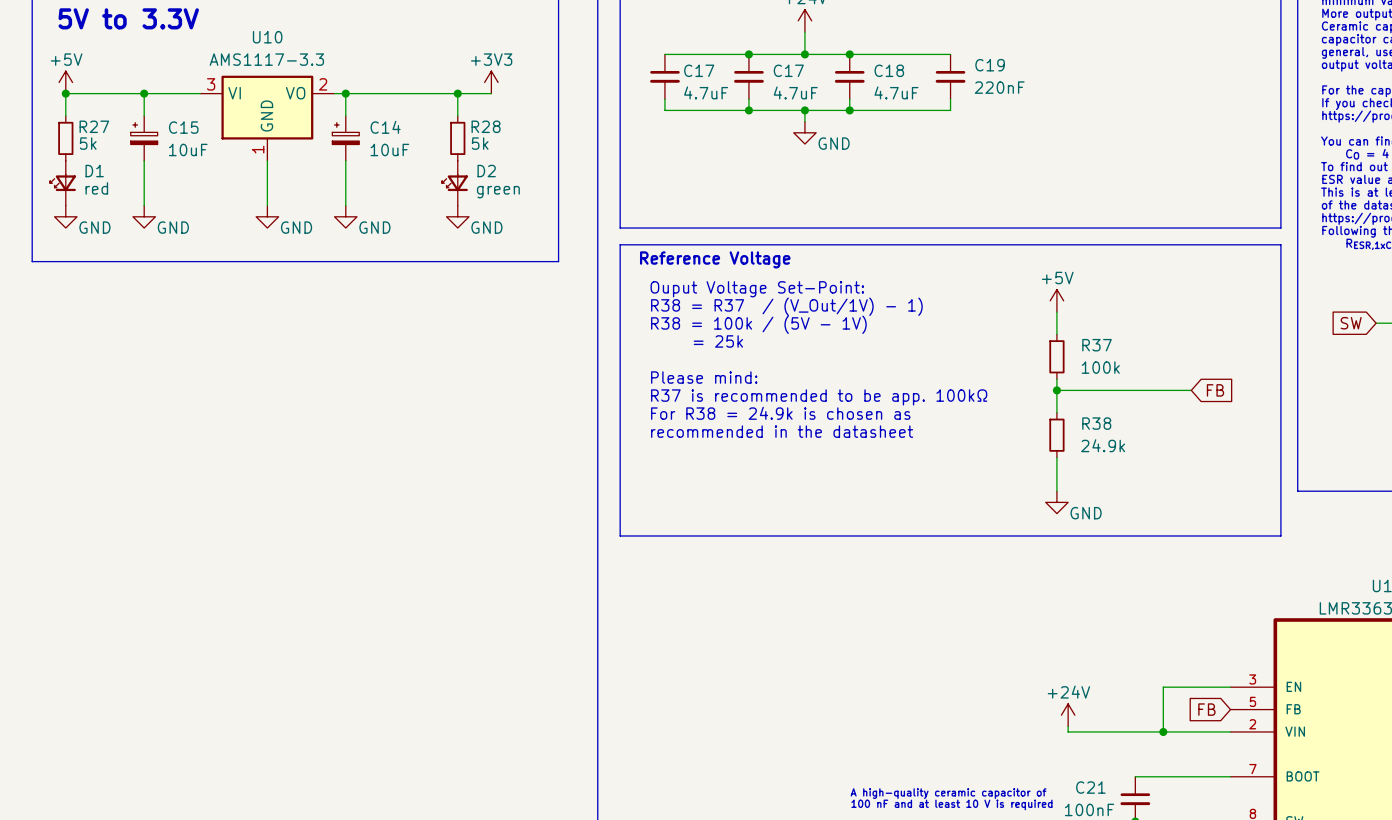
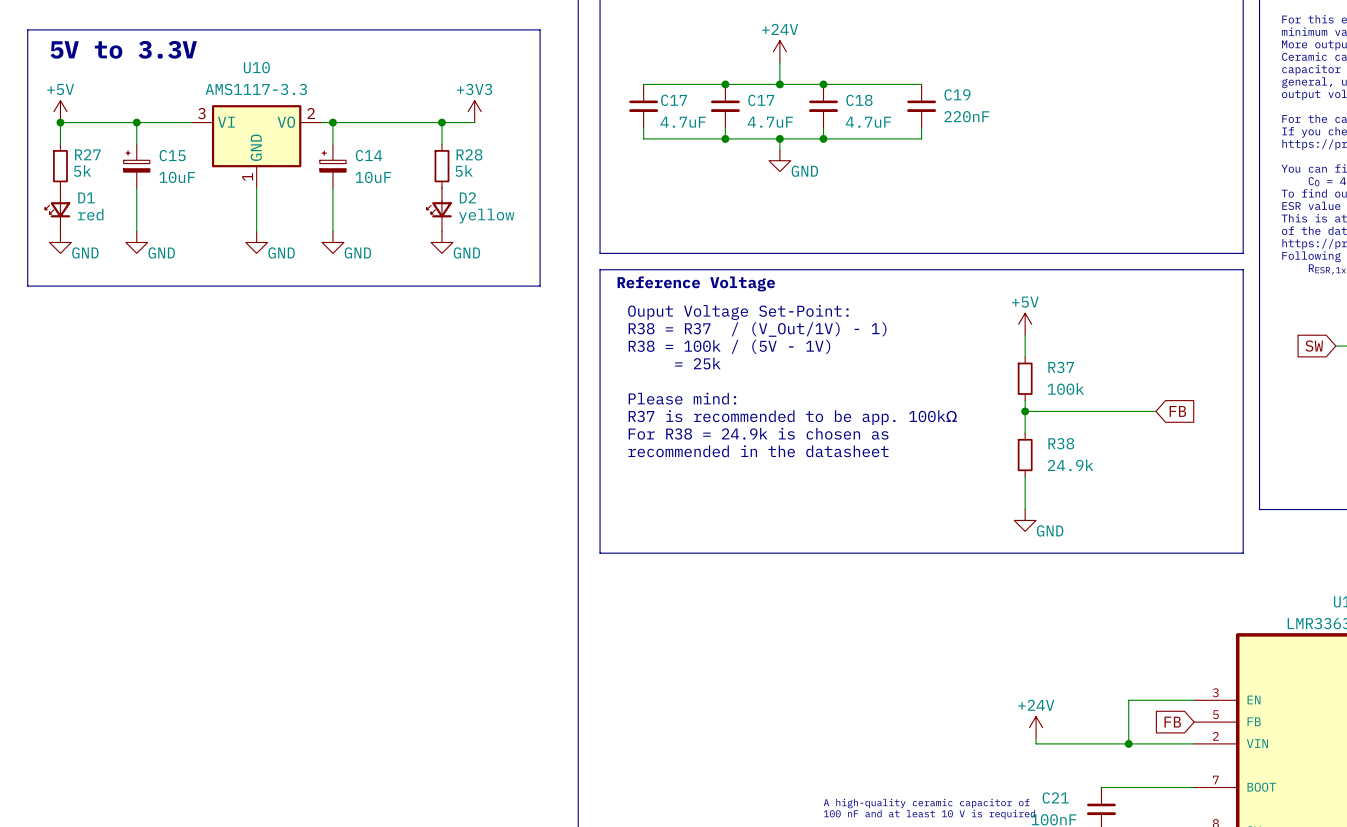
D2 value: green (498, 192) -> yellow (486, 216)

